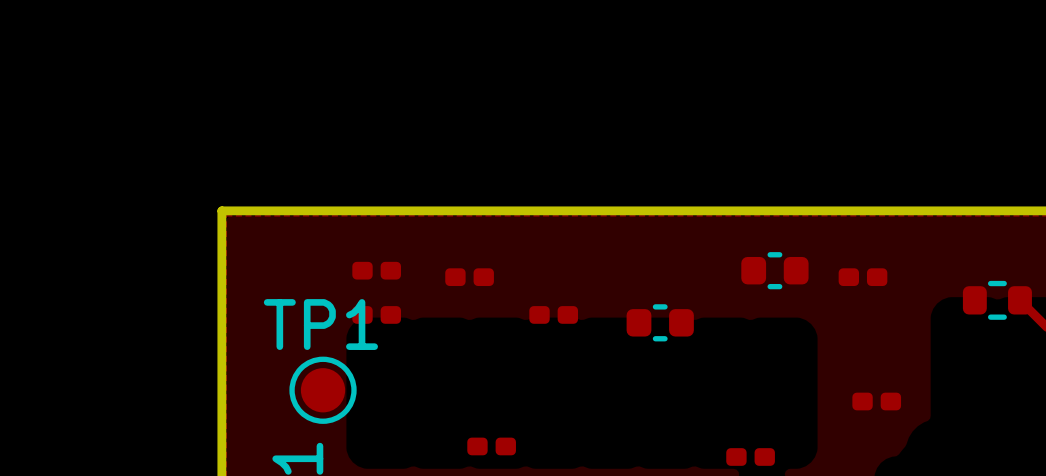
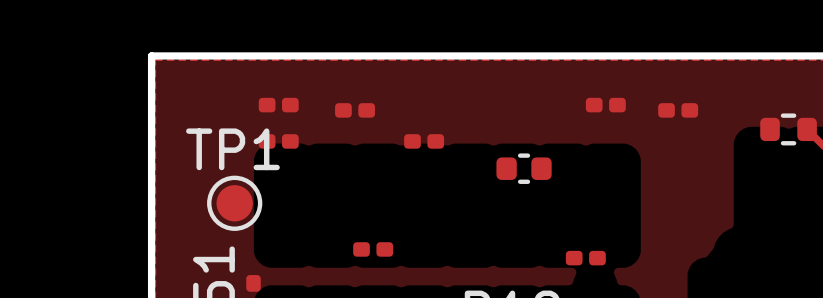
part footprint: [741, 252, 809, 290] -> [585, 97, 626, 113]
part position: (660, 322) -> (524, 168)
part: (876, 401) -> none

